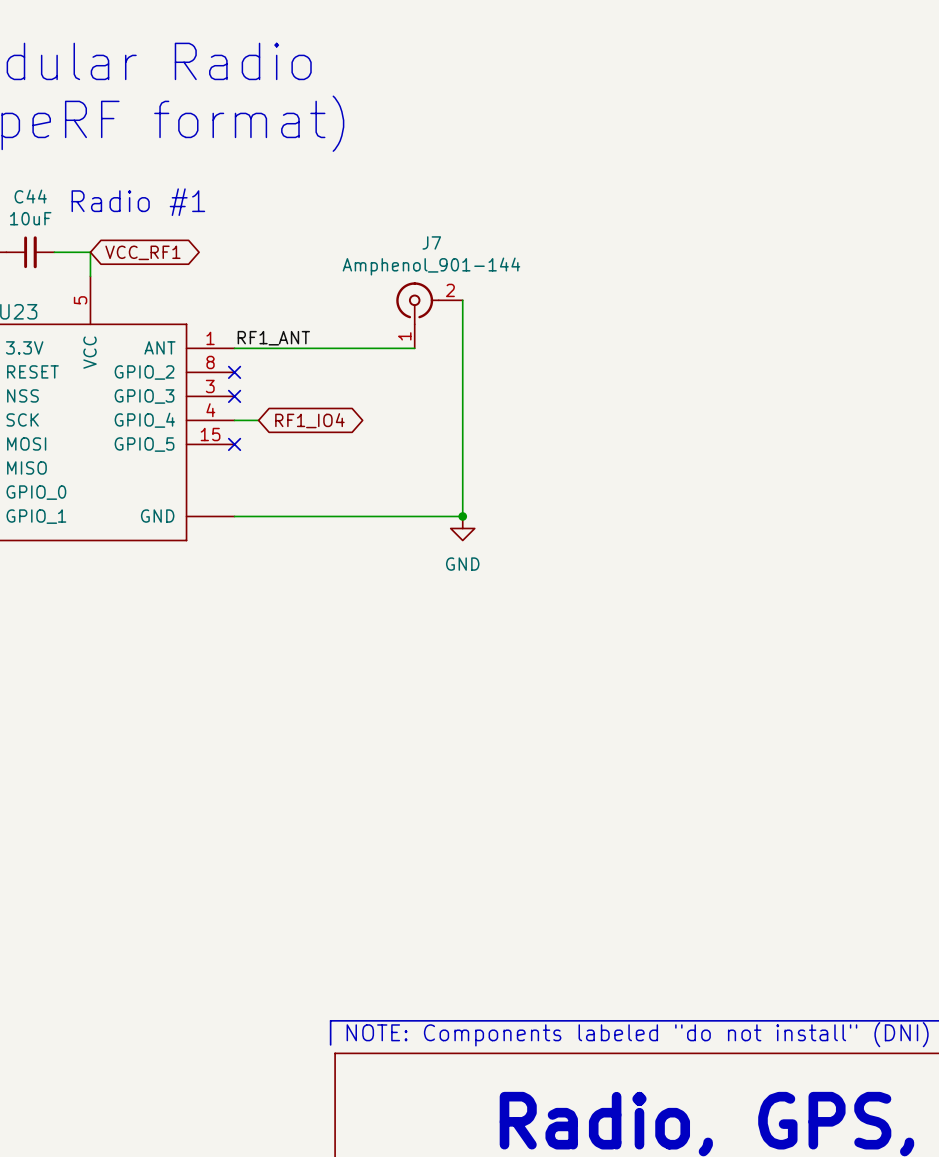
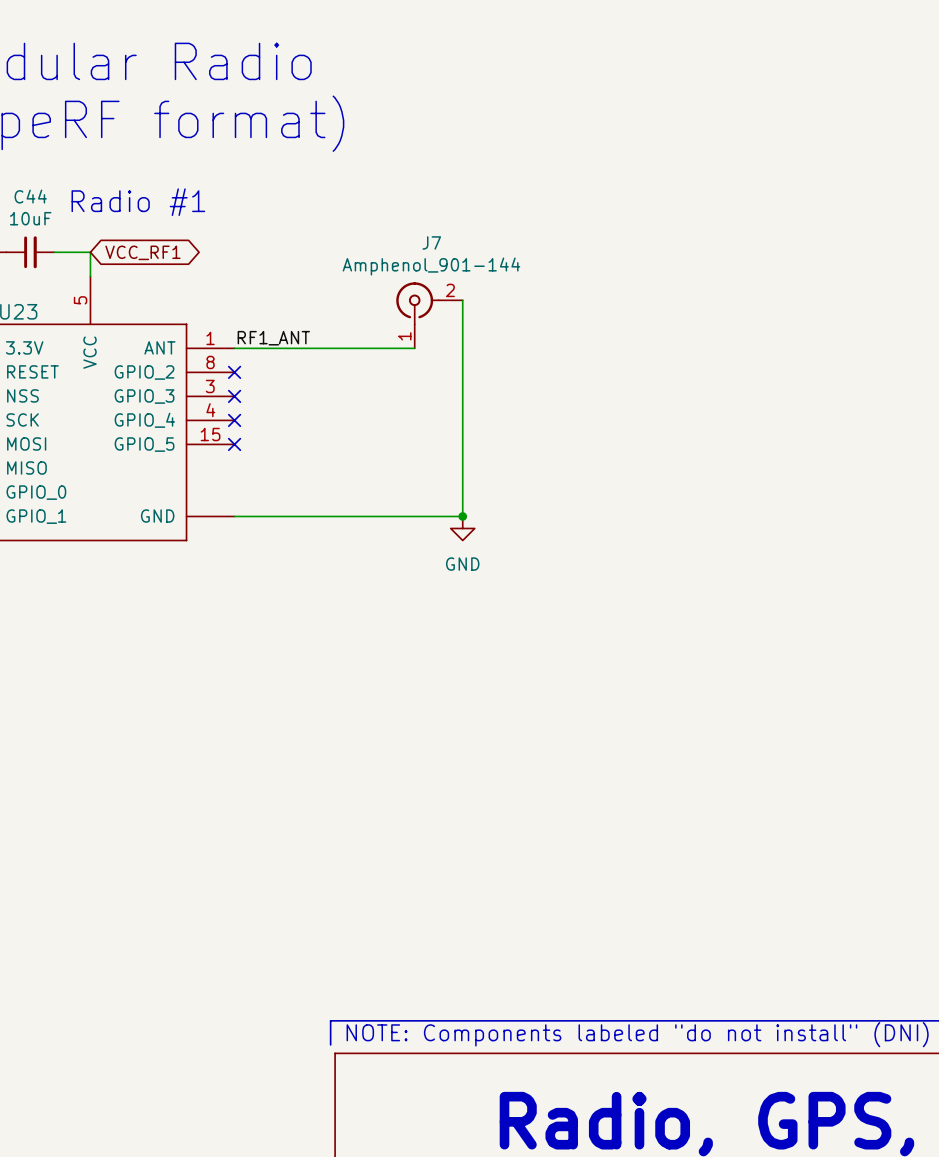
wire: (234, 420) (258, 420) -> none
no-connect mark: none -> (234, 420)
global label: RF1_IO4 (309, 420) -> none

